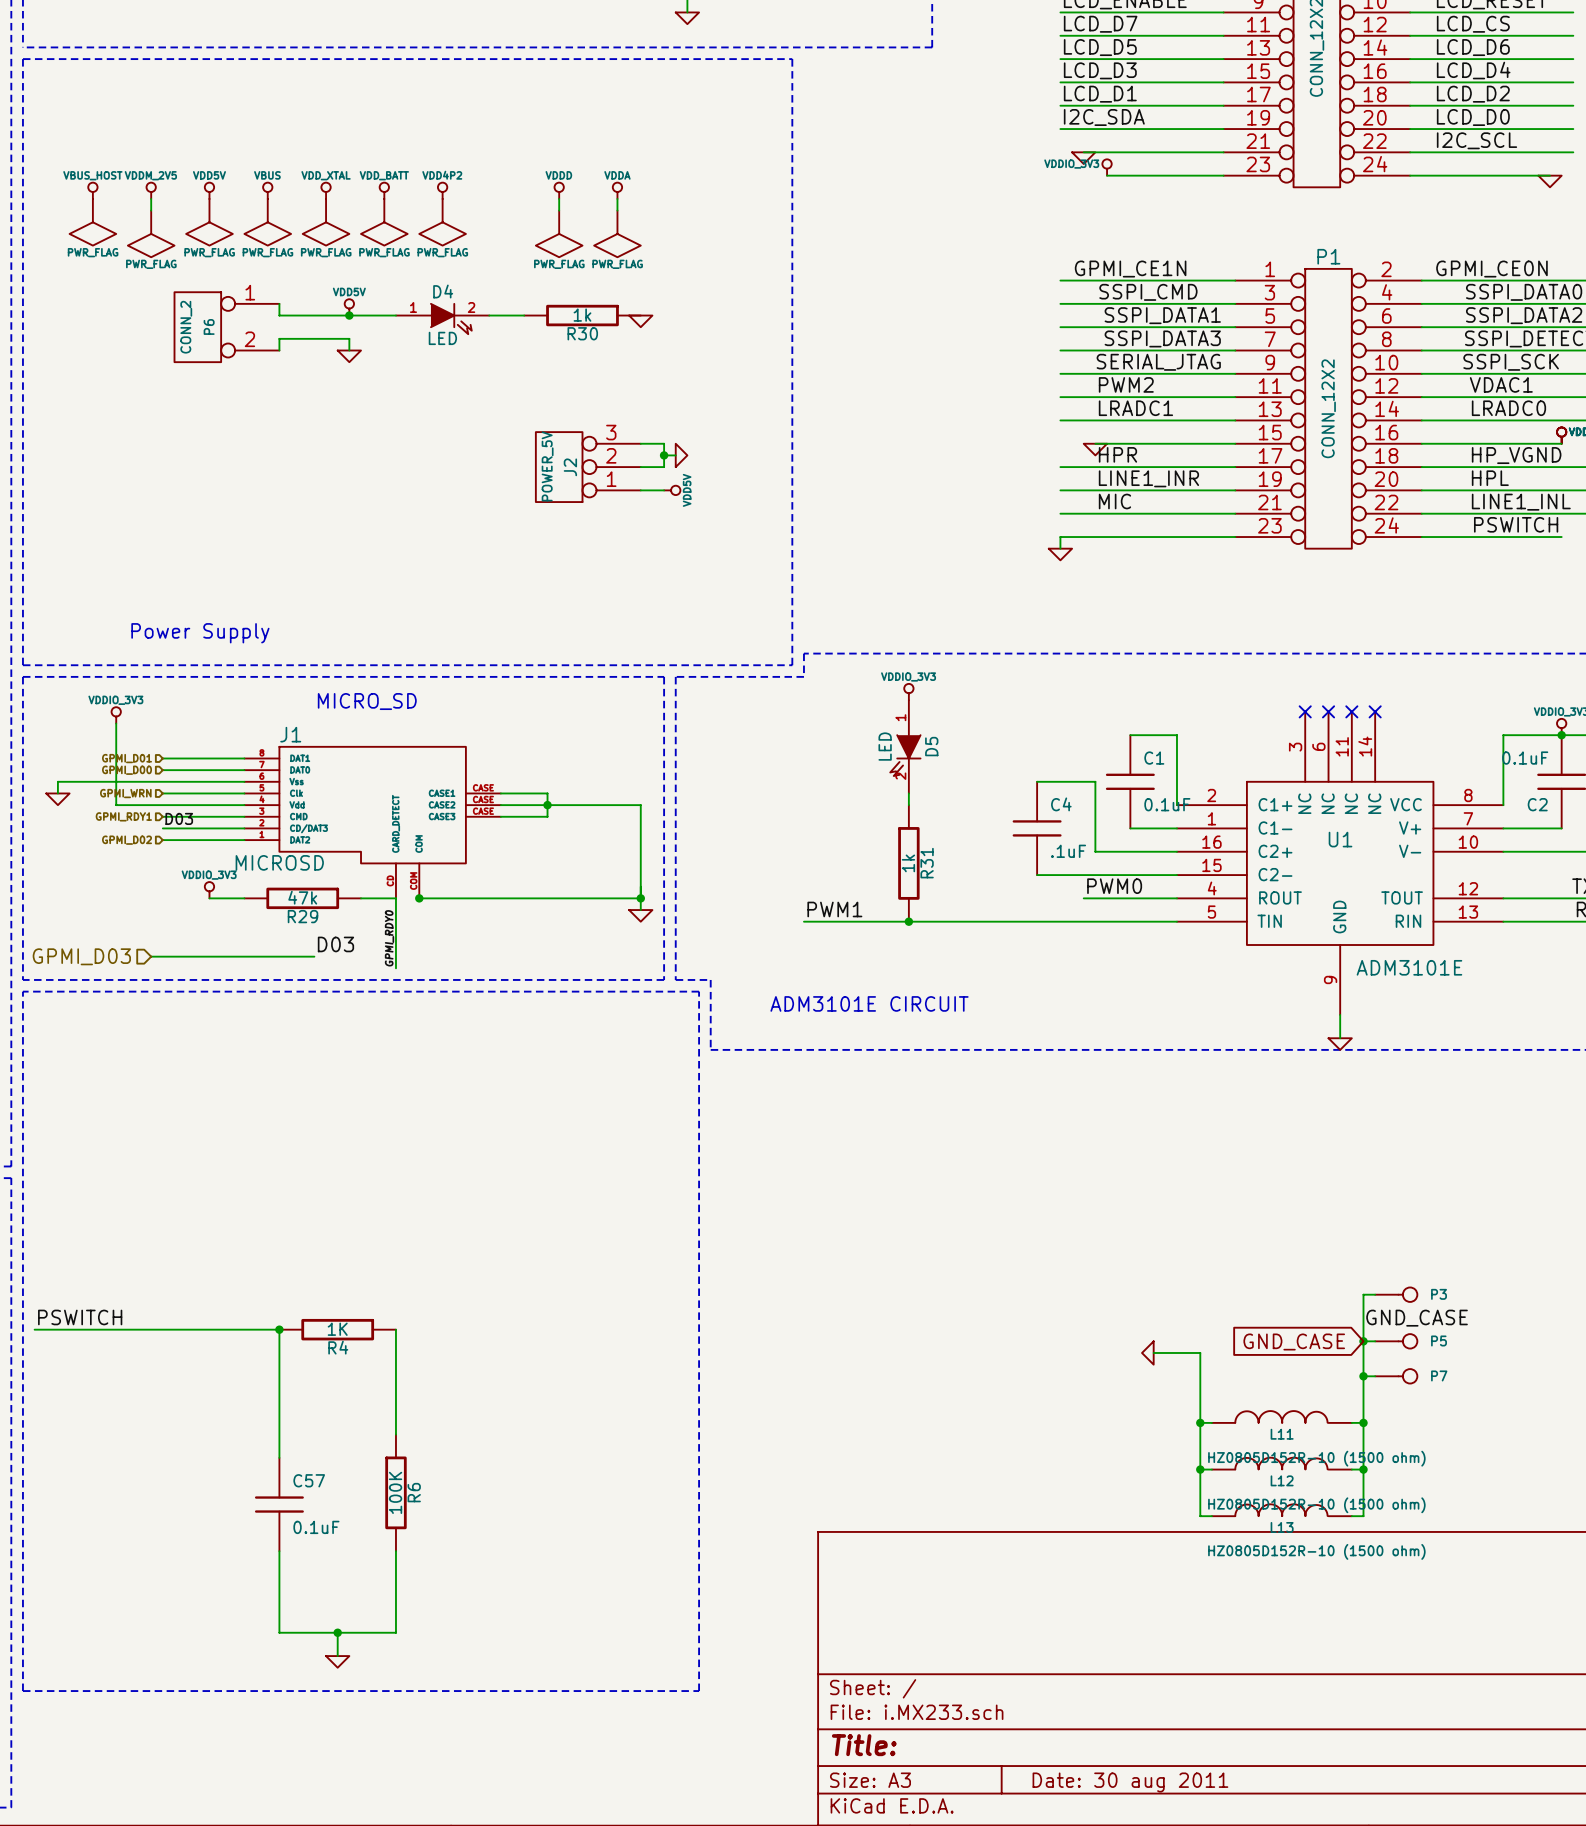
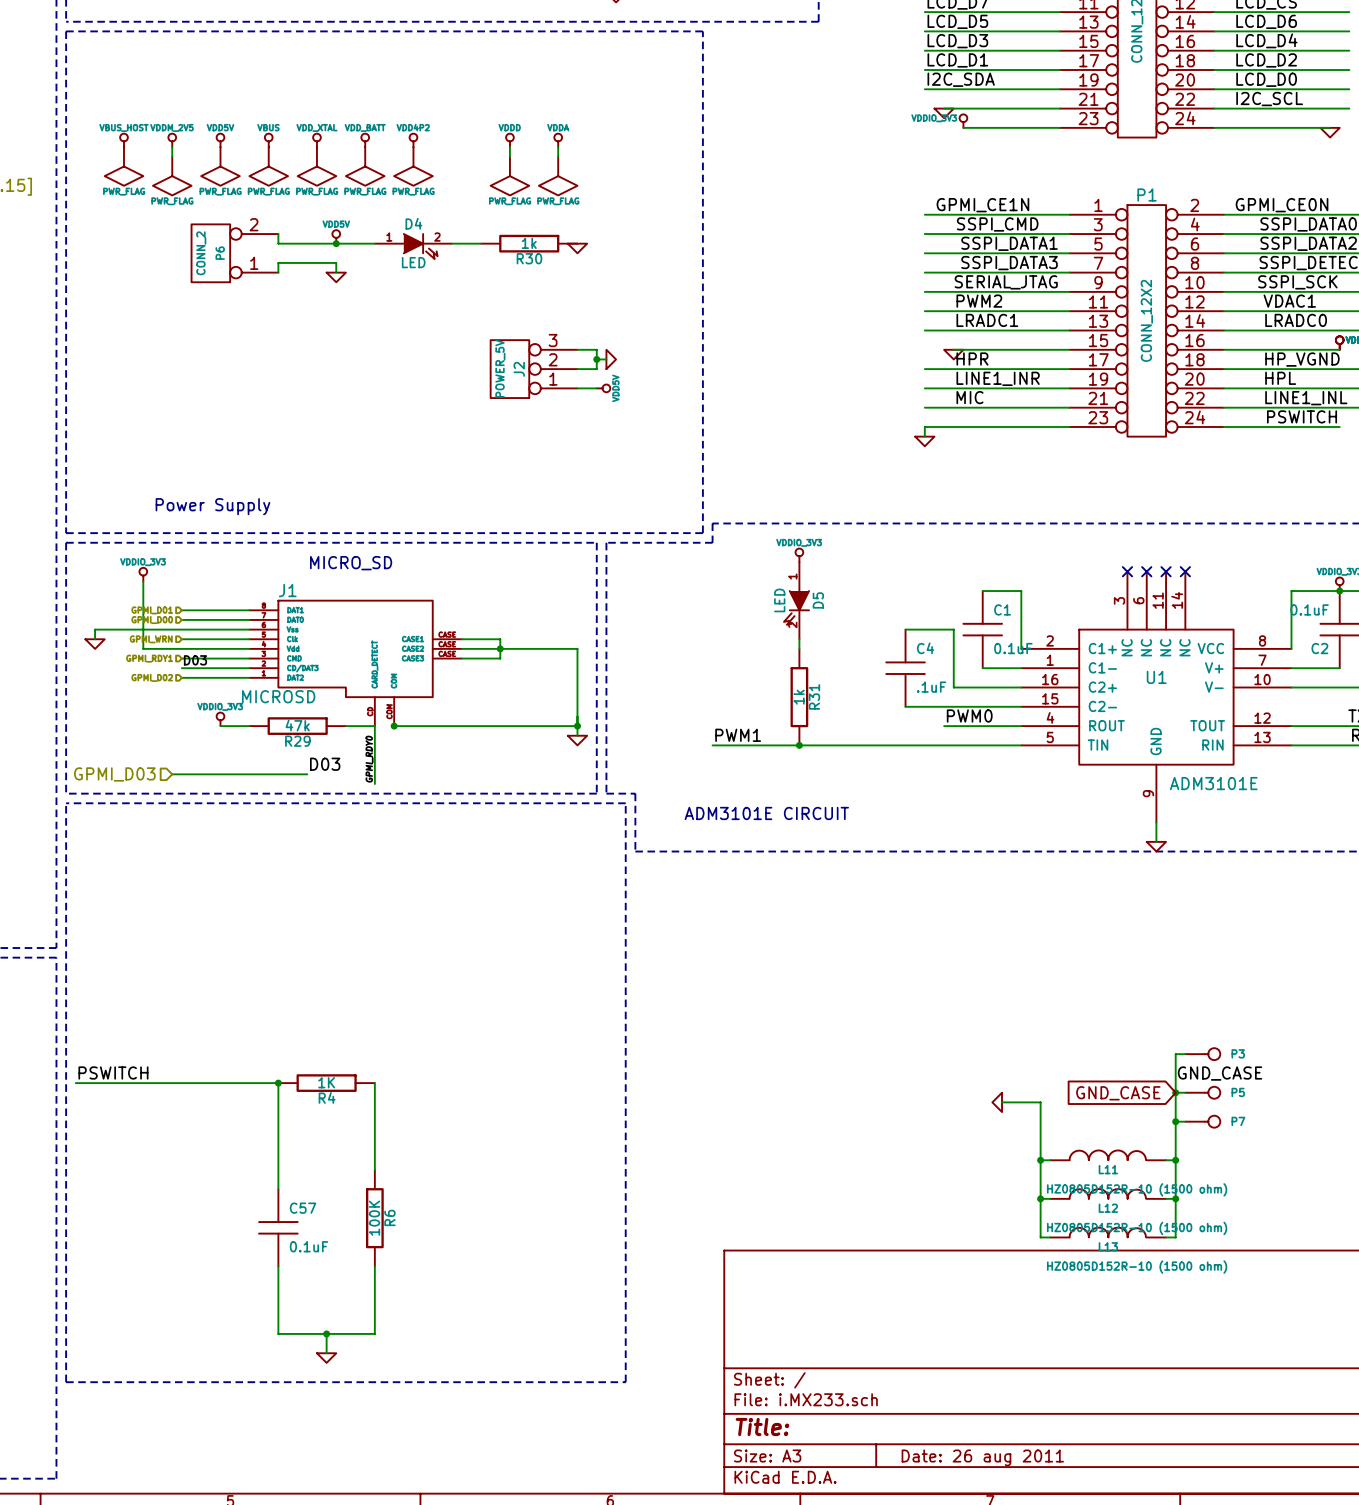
P6 flip: as is (197, 327) -> up-down (210, 253)
title block: Date: 30 aug 2011 (1130, 1782) -> Date: 26 aug 2011 (982, 1457)

